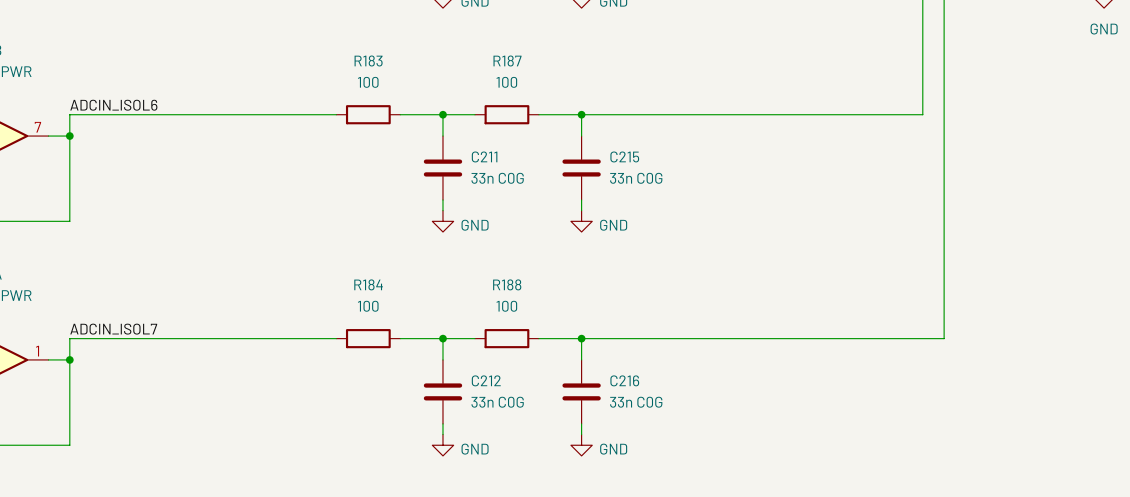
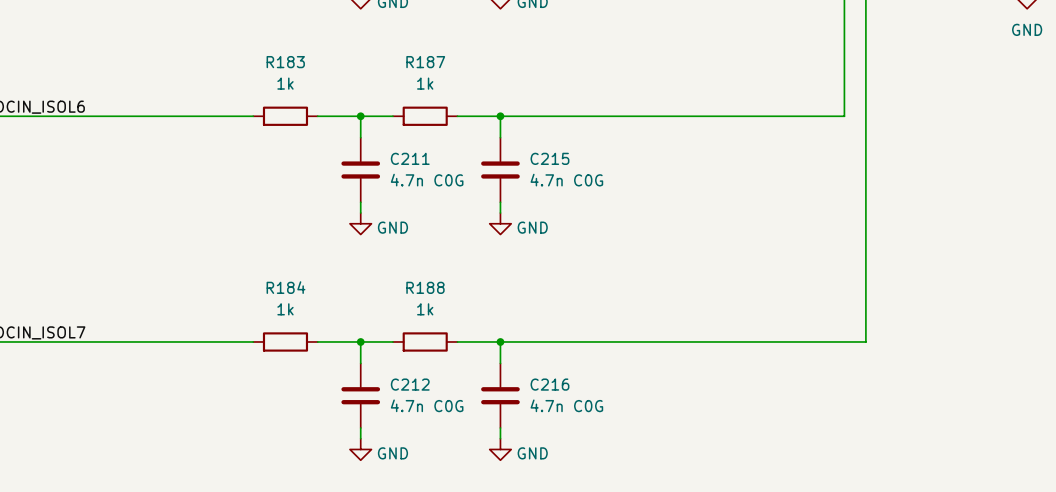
R183 value: 100 (368, 82) -> 1k (285, 83)
R187 value: 100 (506, 82) -> 1k (425, 83)
C211 value: 33n C0G (497, 178) -> 4.7n C0G (427, 180)
C215 value: 33n C0G (636, 178) -> 4.7n C0G (566, 180)
R184 value: 100 (368, 306) -> 1k (285, 309)
R188 value: 100 (506, 306) -> 1k (425, 309)
C212 value: 33n C0G (497, 402) -> 4.7n C0G (427, 405)
C216 value: 33n C0G (636, 402) -> 4.7n C0G (566, 405)

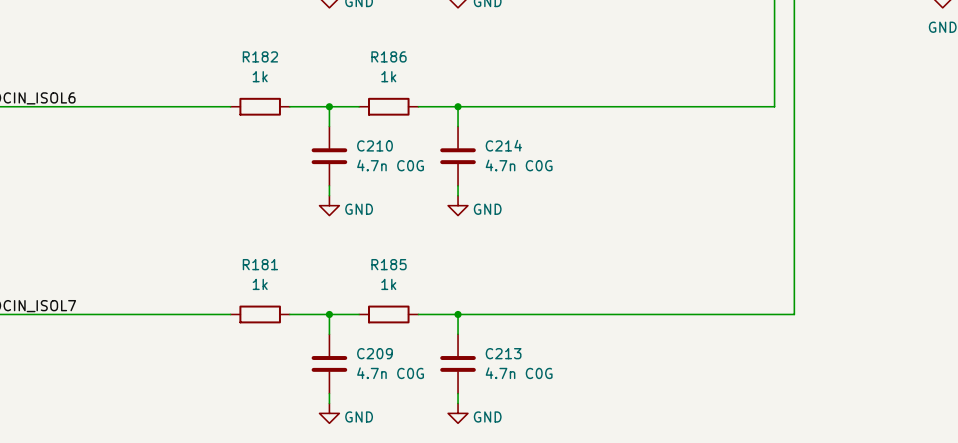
R183 name: R183 (285, 62) -> R182 (260, 56)
R187 name: R187 (425, 62) -> R186 (389, 56)
C211 name: C211 (410, 158) -> C210 (375, 145)
C215 name: C215 (549, 158) -> C214 (503, 145)
R184 name: R184 (285, 287) -> R181 (260, 264)
R188 name: R188 (425, 287) -> R185 (389, 264)
C212 name: C212 (410, 384) -> C209 (375, 353)
C216 name: C216 (549, 384) -> C213 (503, 353)

